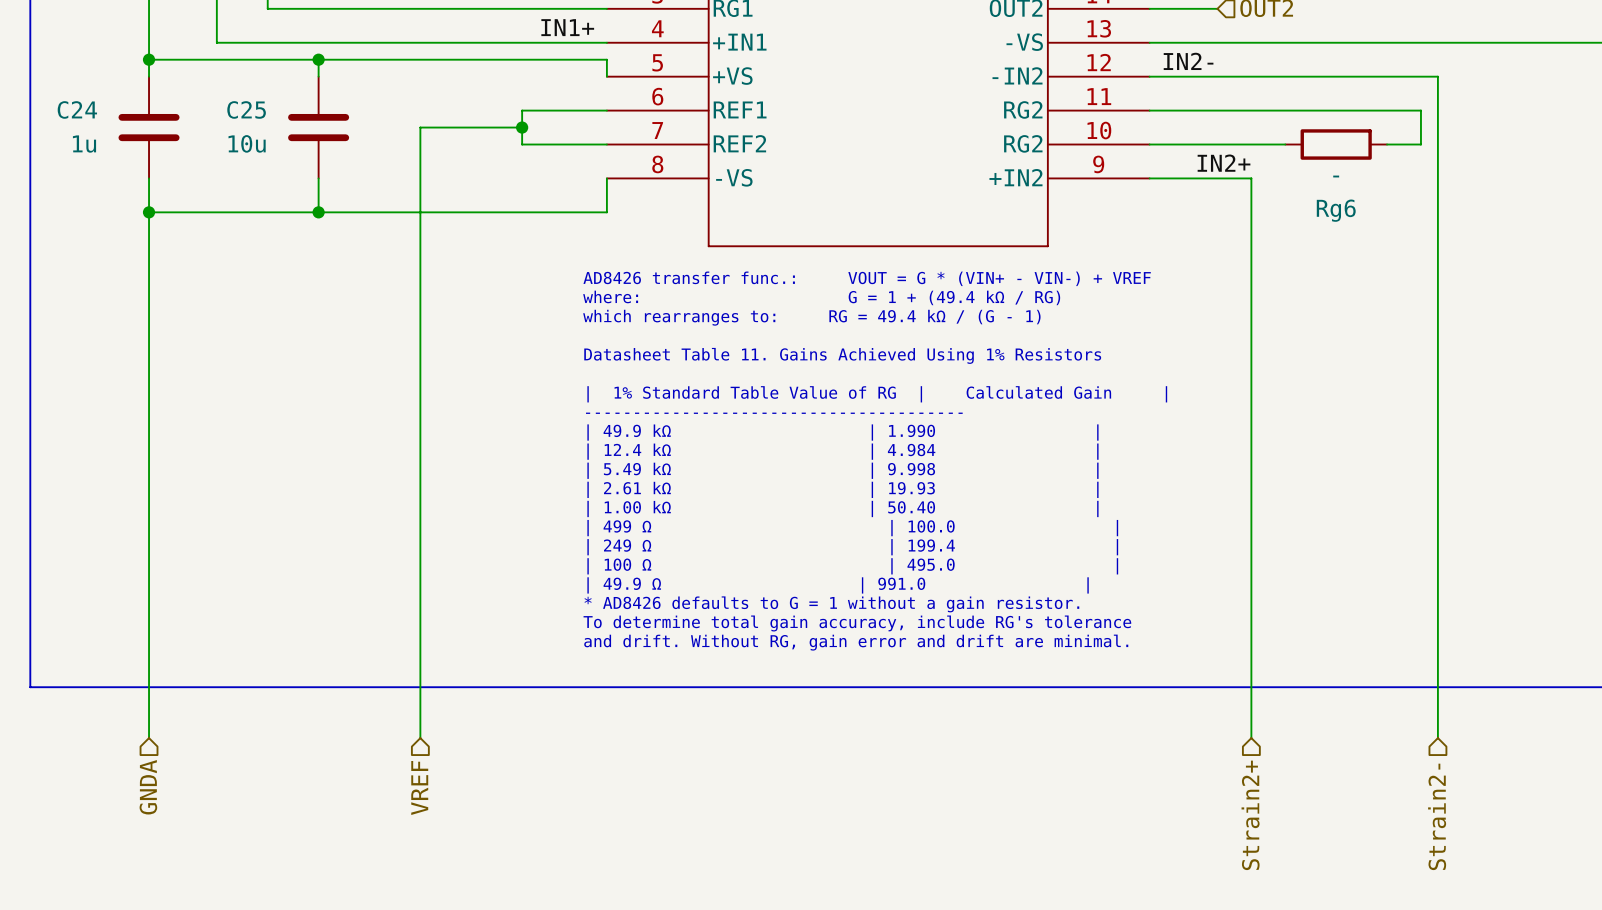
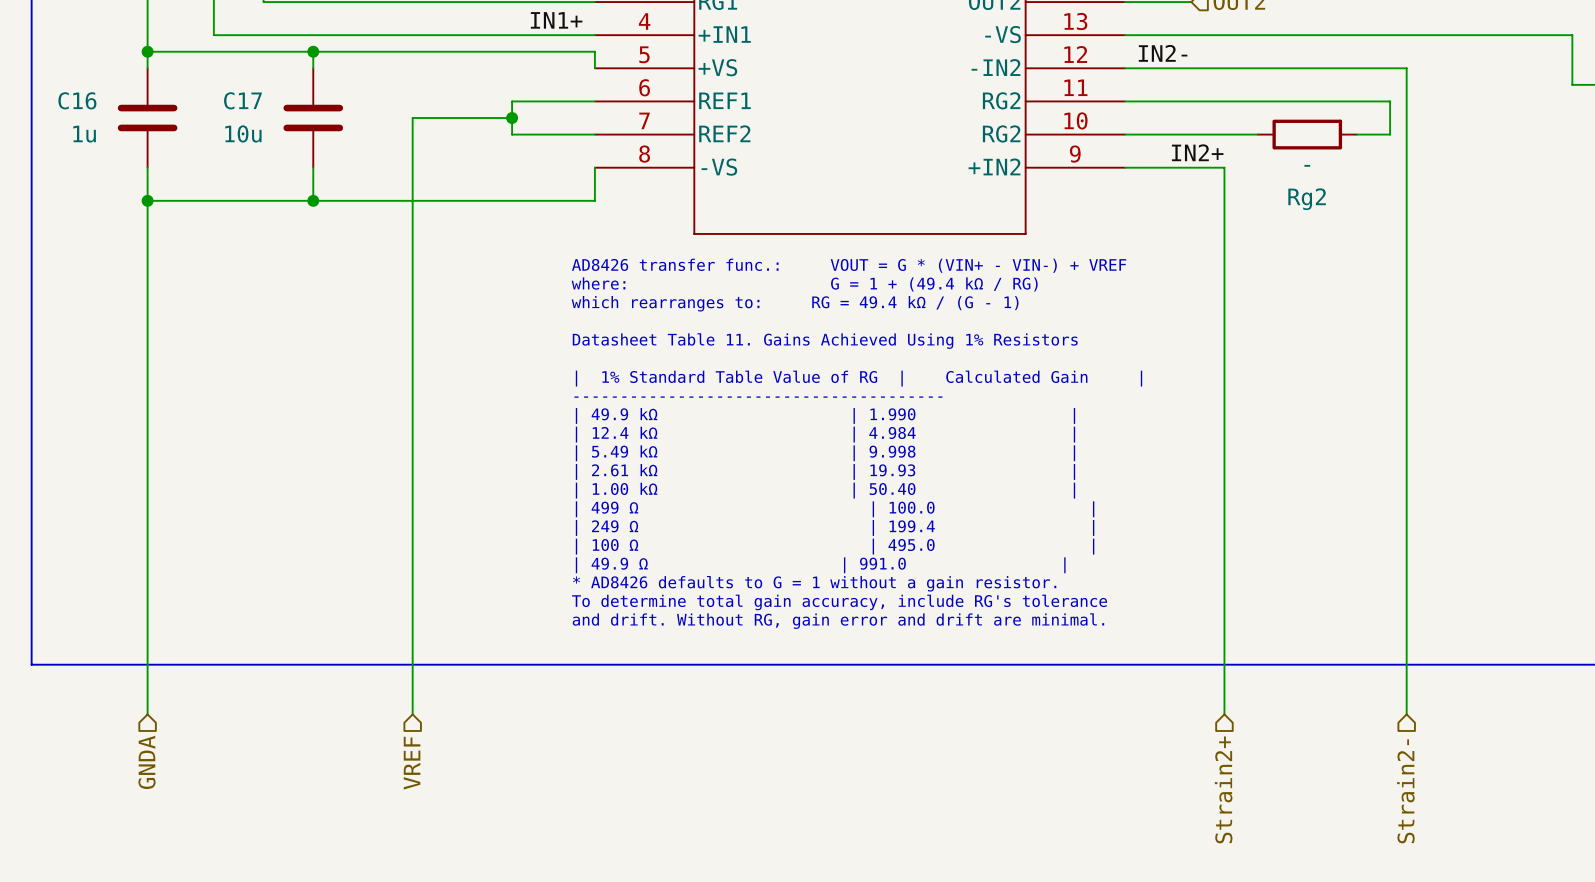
C24 name: C24 (77, 109) -> C16 (77, 100)
C25 name: C25 (246, 109) -> C17 (242, 100)
Rg6 name: Rg6 (1336, 210) -> Rg2 (1307, 199)

